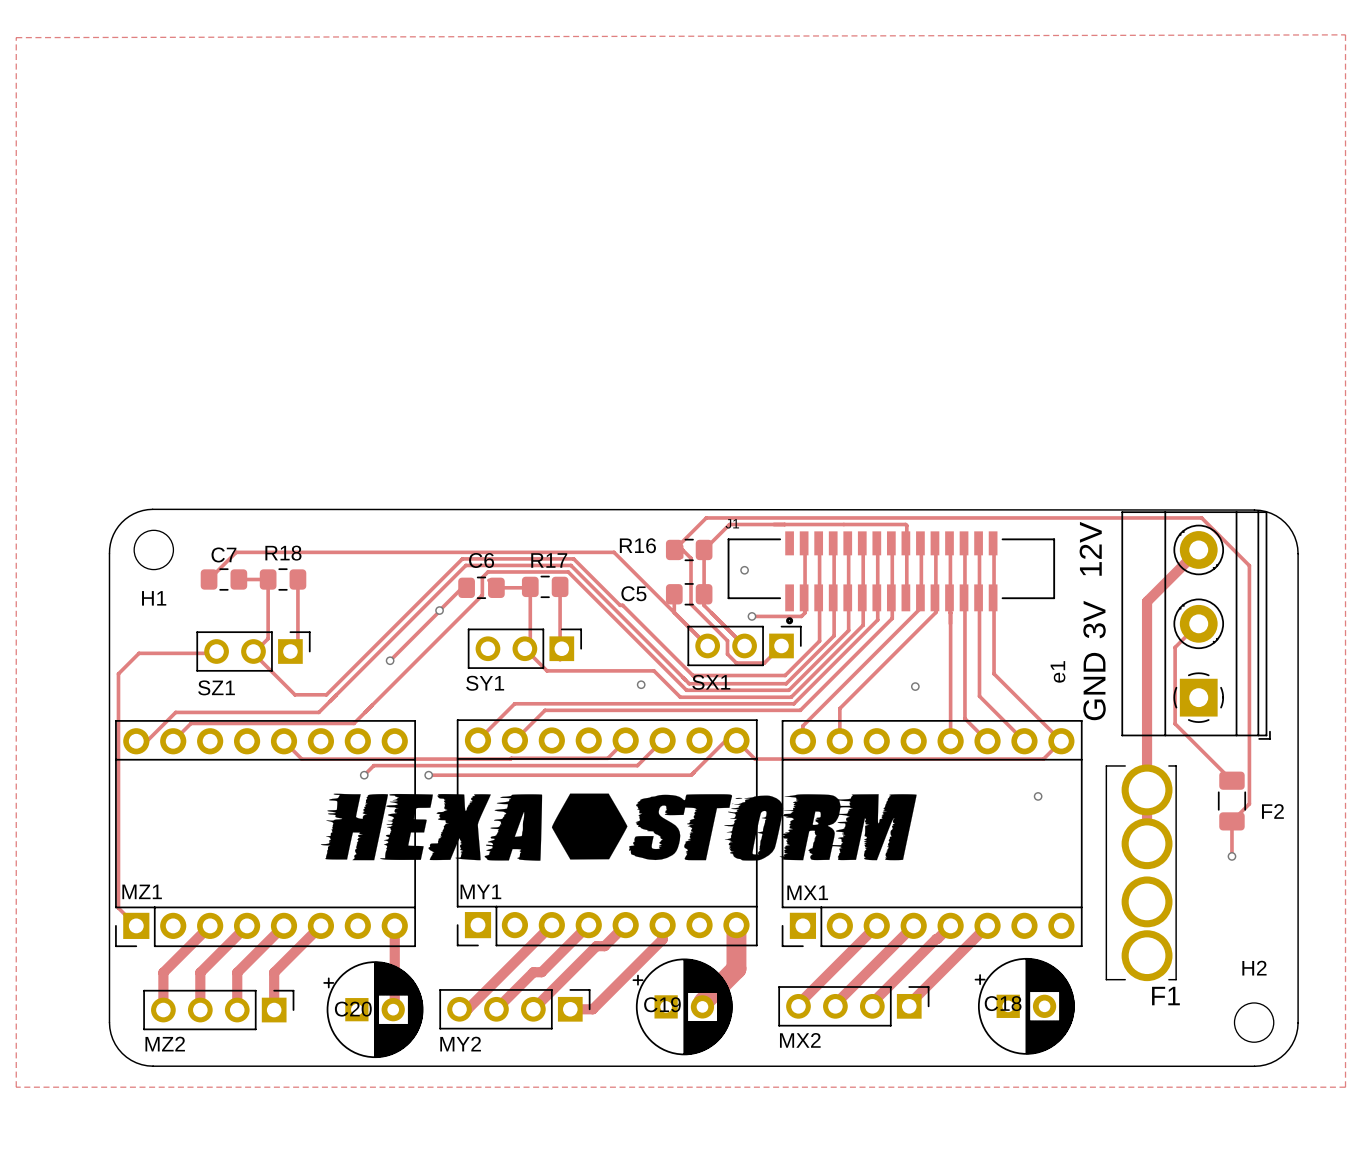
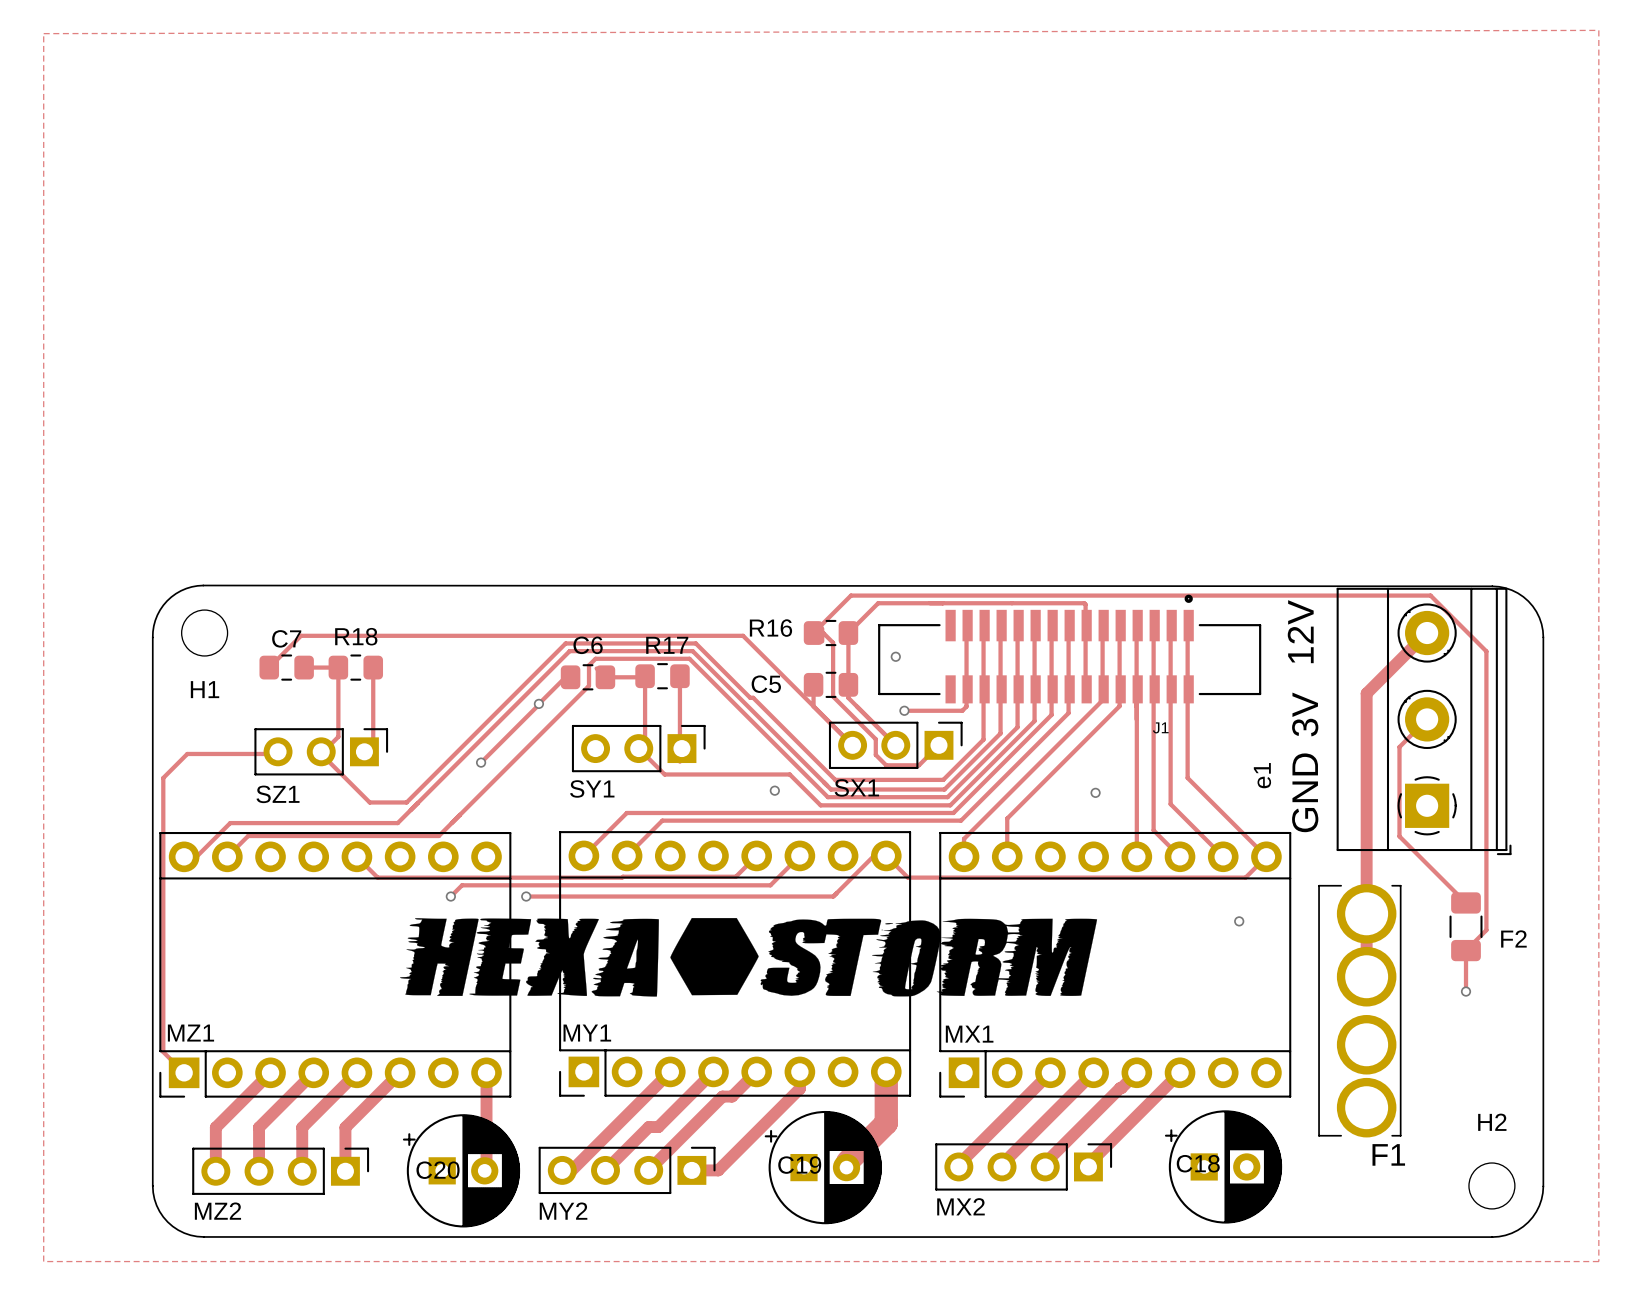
J1 name position: J1 (732, 523) -> J1 (1160, 727)
J1 rotation: 0° (891, 577) -> 180° (1069, 649)

